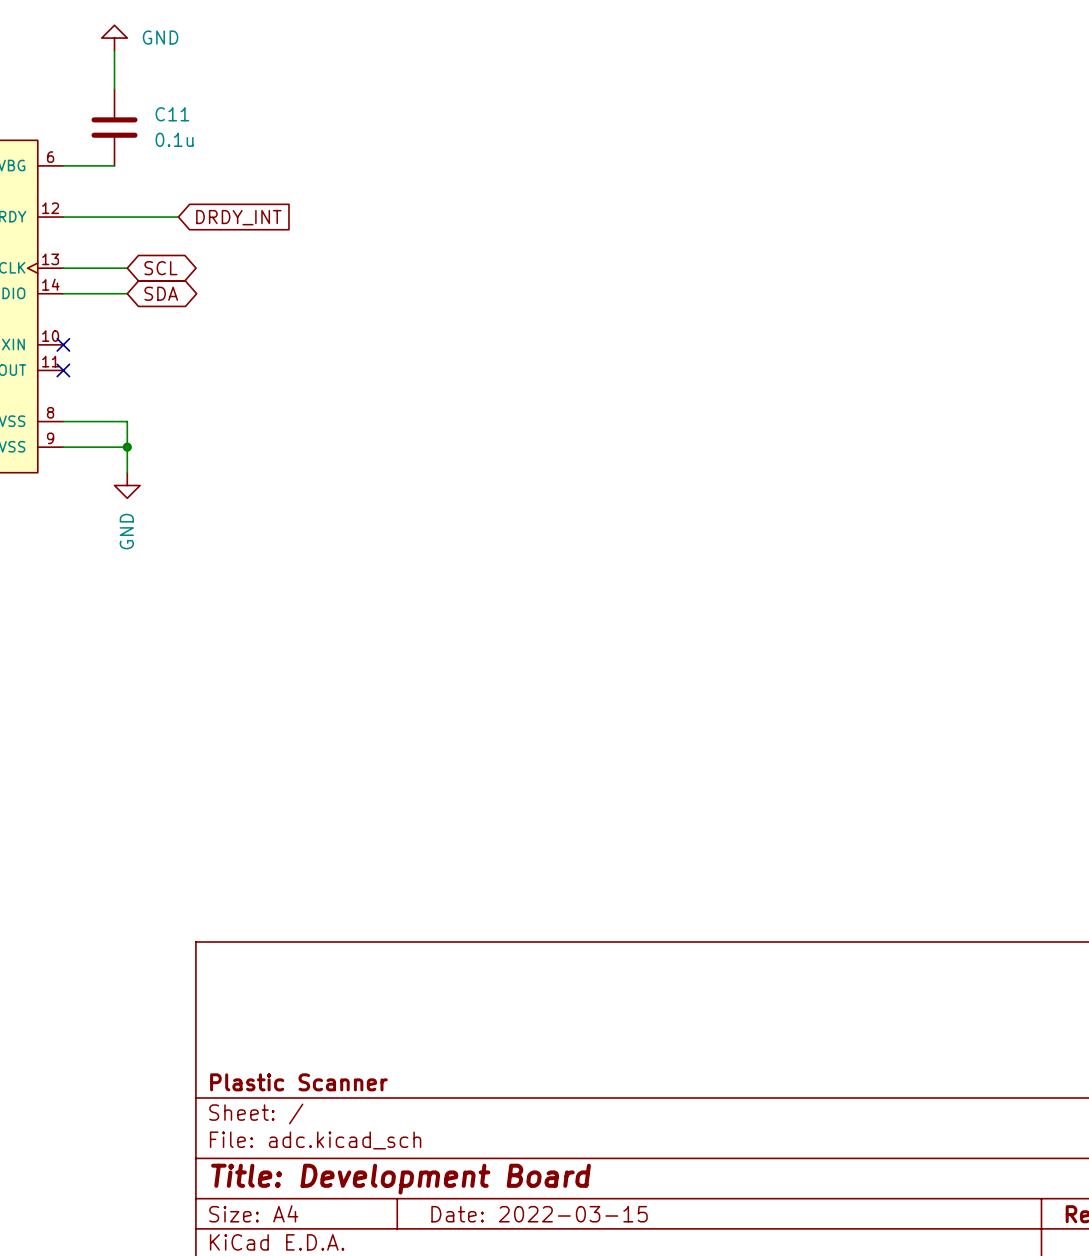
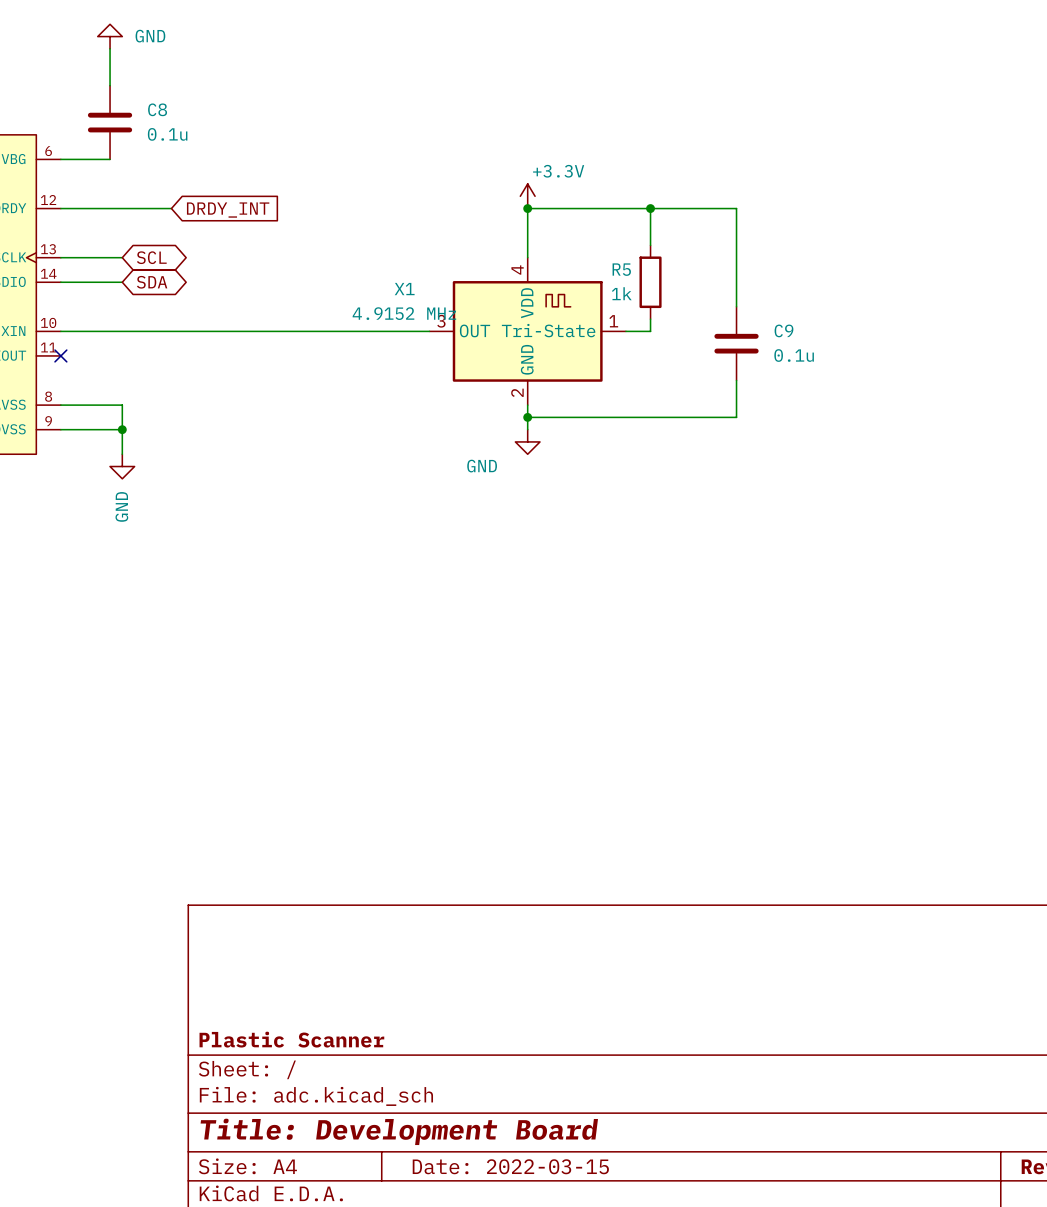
C11 name: C11 (172, 114) -> C8 (157, 109)
power symbol: none -> +3.3V (527, 196)
junction: none -> (527, 208)
wire: none -> (650, 208) (650, 245)
junction: none -> (650, 208)
wire: none -> (527, 257) (527, 208) (736, 208) (736, 306)
R5: none -> 1k (650, 282)
wire: none -> (650, 319) (650, 331) (625, 331)
wire: none -> (60, 331) (429, 331)
no-connect mark: (63, 344) -> none
X1: none -> 4.9152 MHz (527, 331)
C9: none -> 0.1u (736, 343)
wire: none -> (736, 380) (736, 417) (527, 417)
wire: none -> (527, 405) (527, 429)
junction: none -> (527, 417)
power symbol: none -> GND (527, 441)

